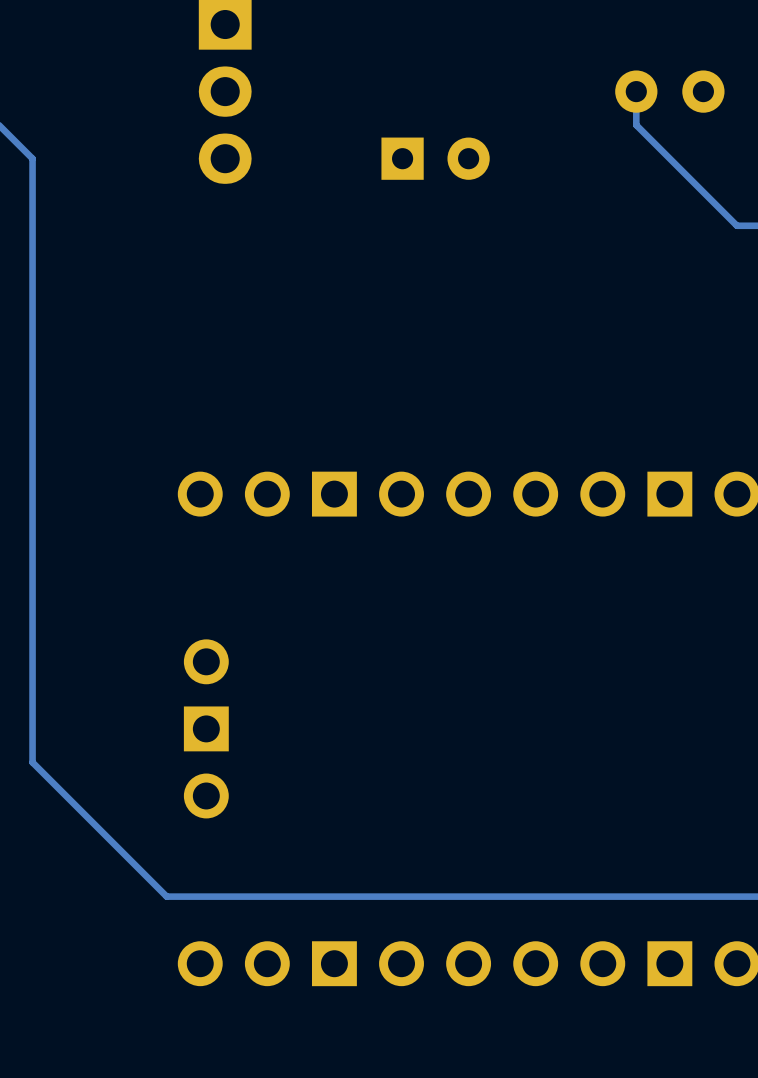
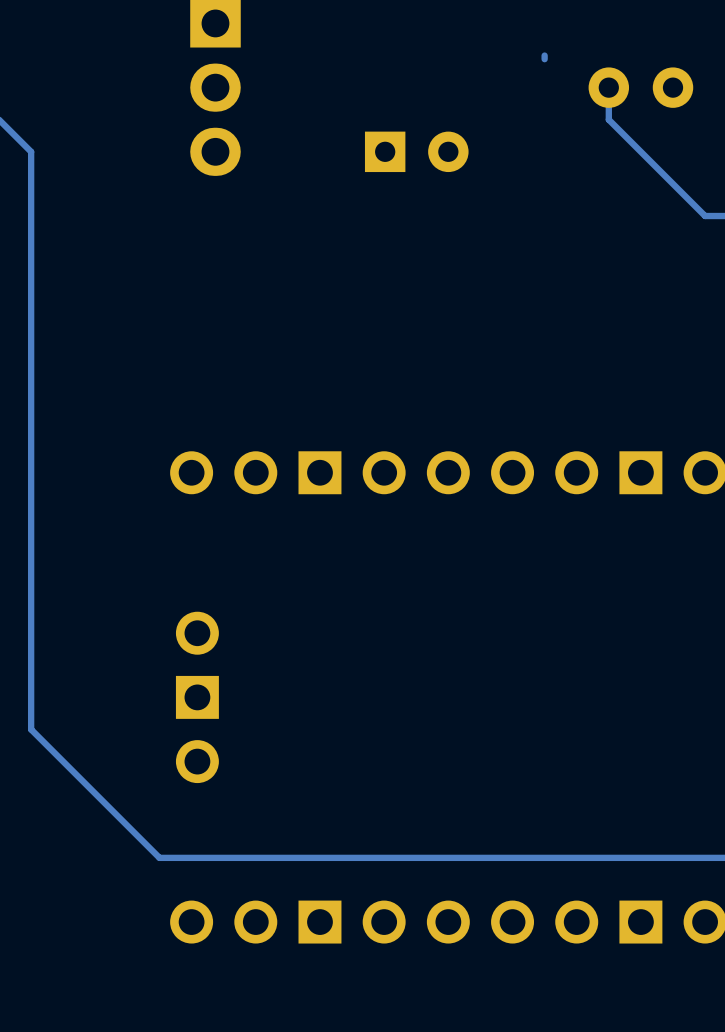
track: none -> (544, 55) (544, 59)

